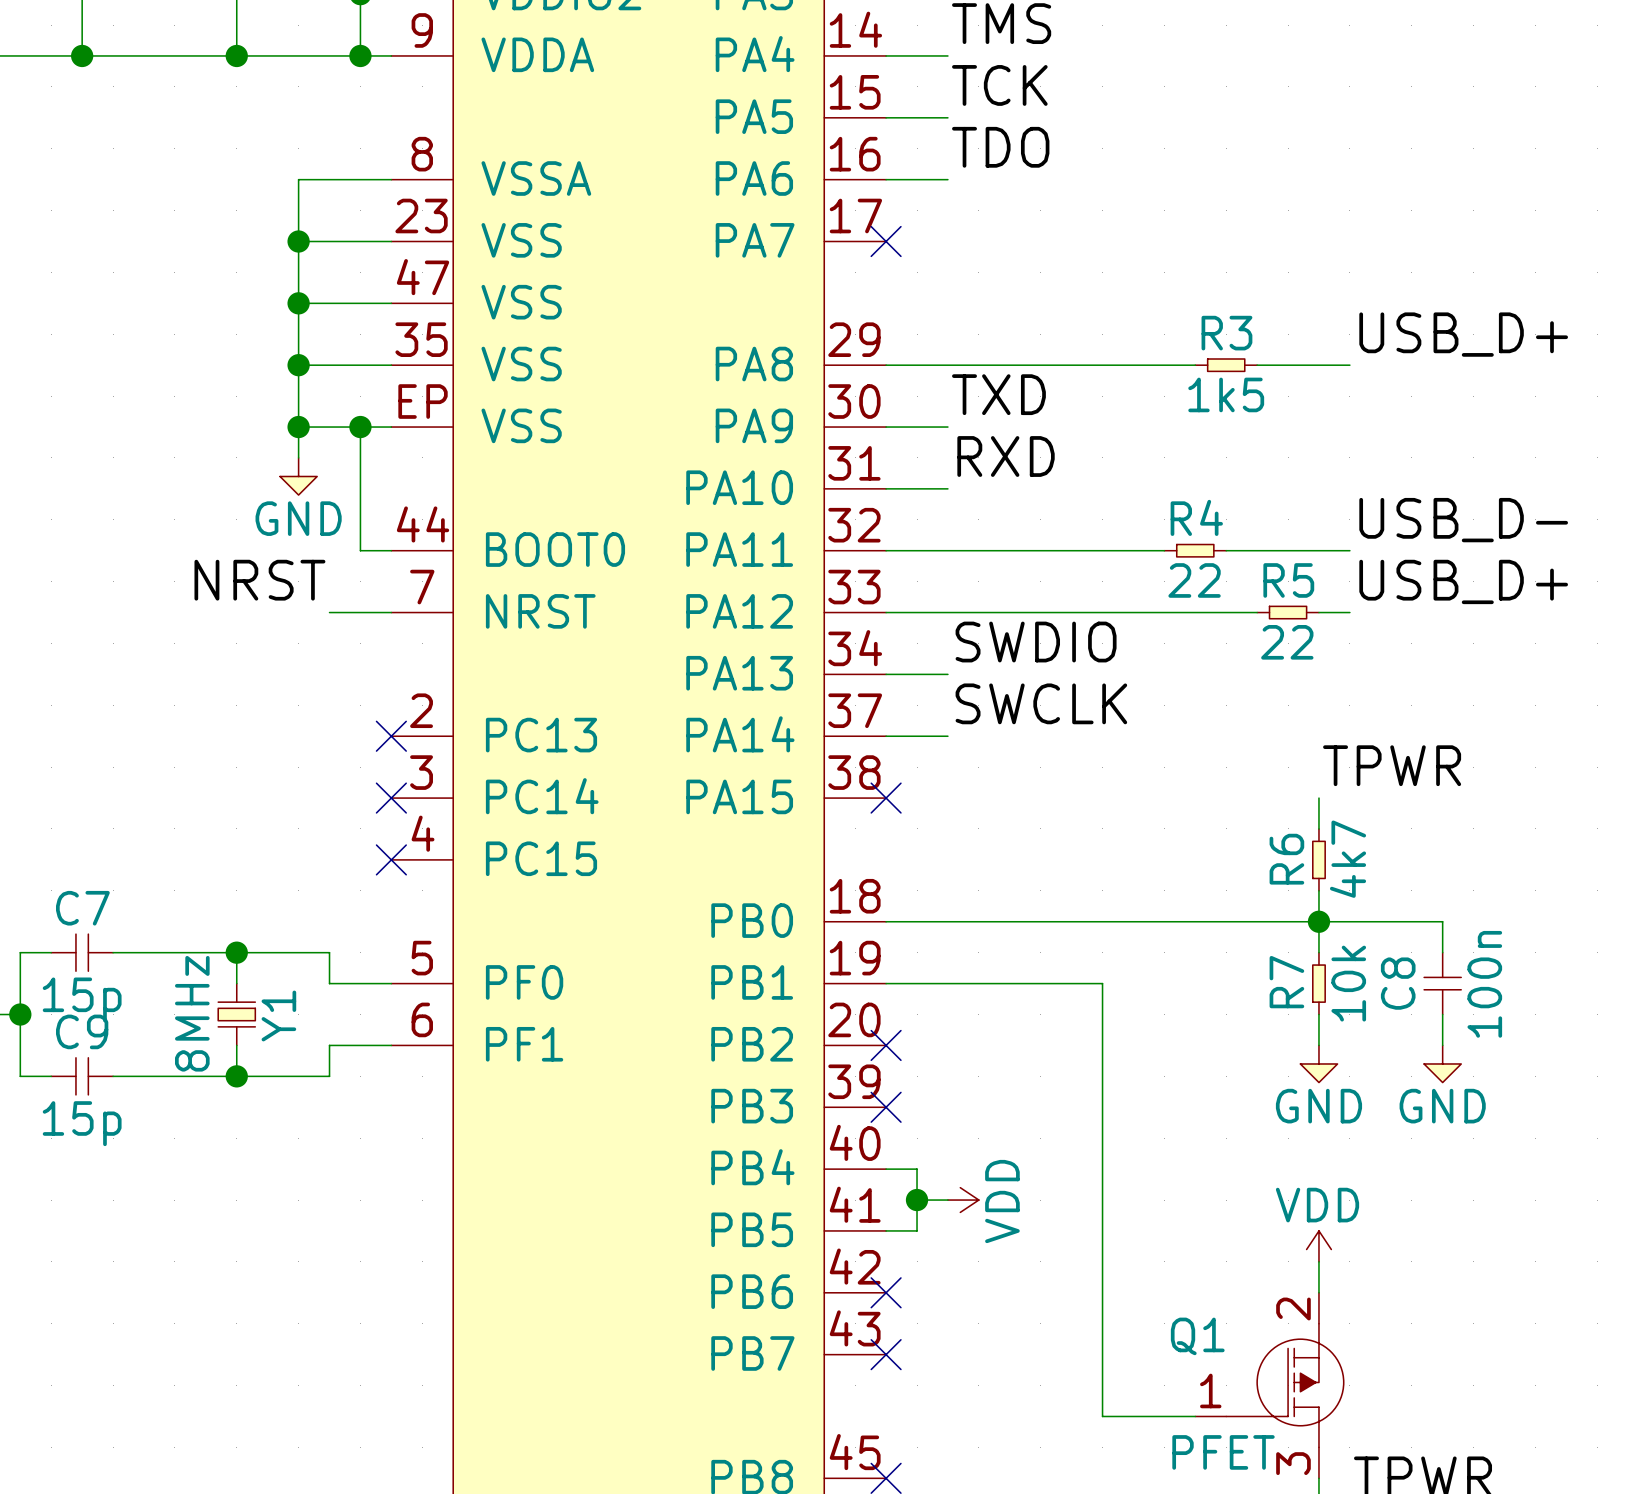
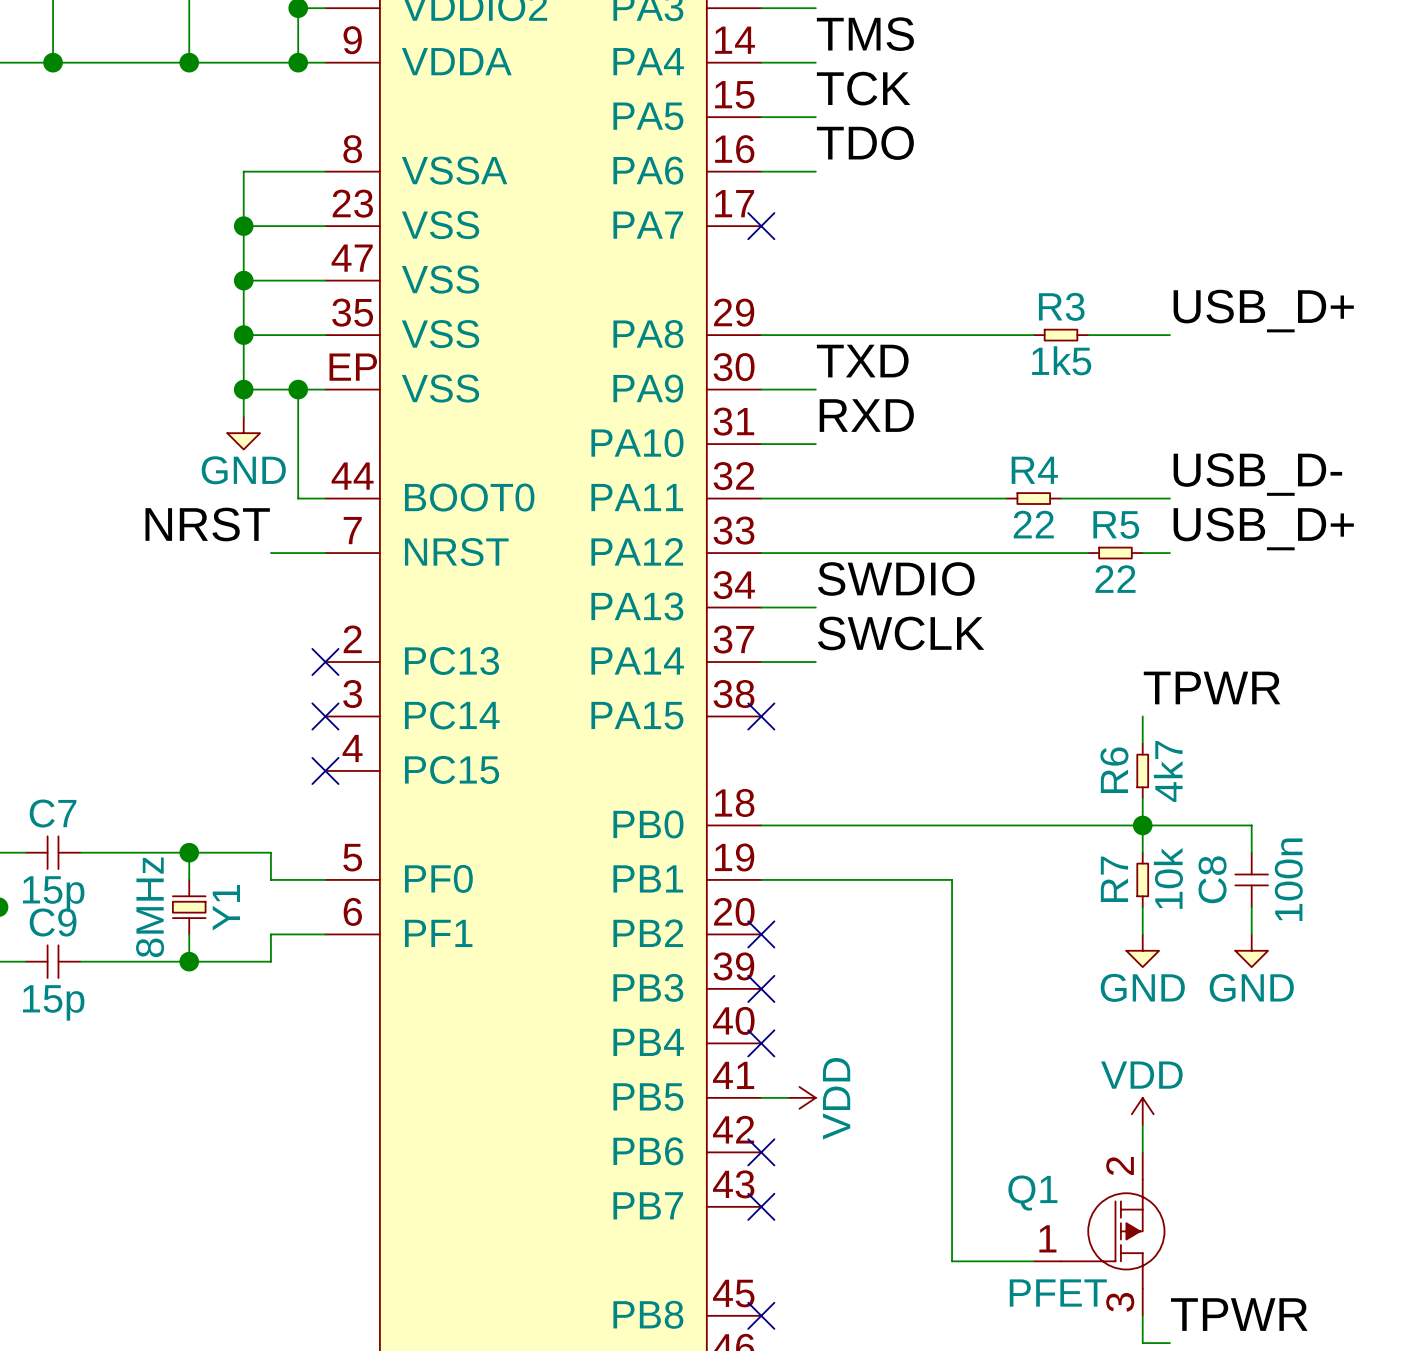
wire: (886, 1169) (917, 1169) (917, 1230) -> none
no-connect mark: none -> (761, 1043)
wire: (917, 1200) (947, 1200) -> none
junction: (917, 1200) -> none
power symbol position: VDD (963, 1200) -> VDD (802, 1097)

